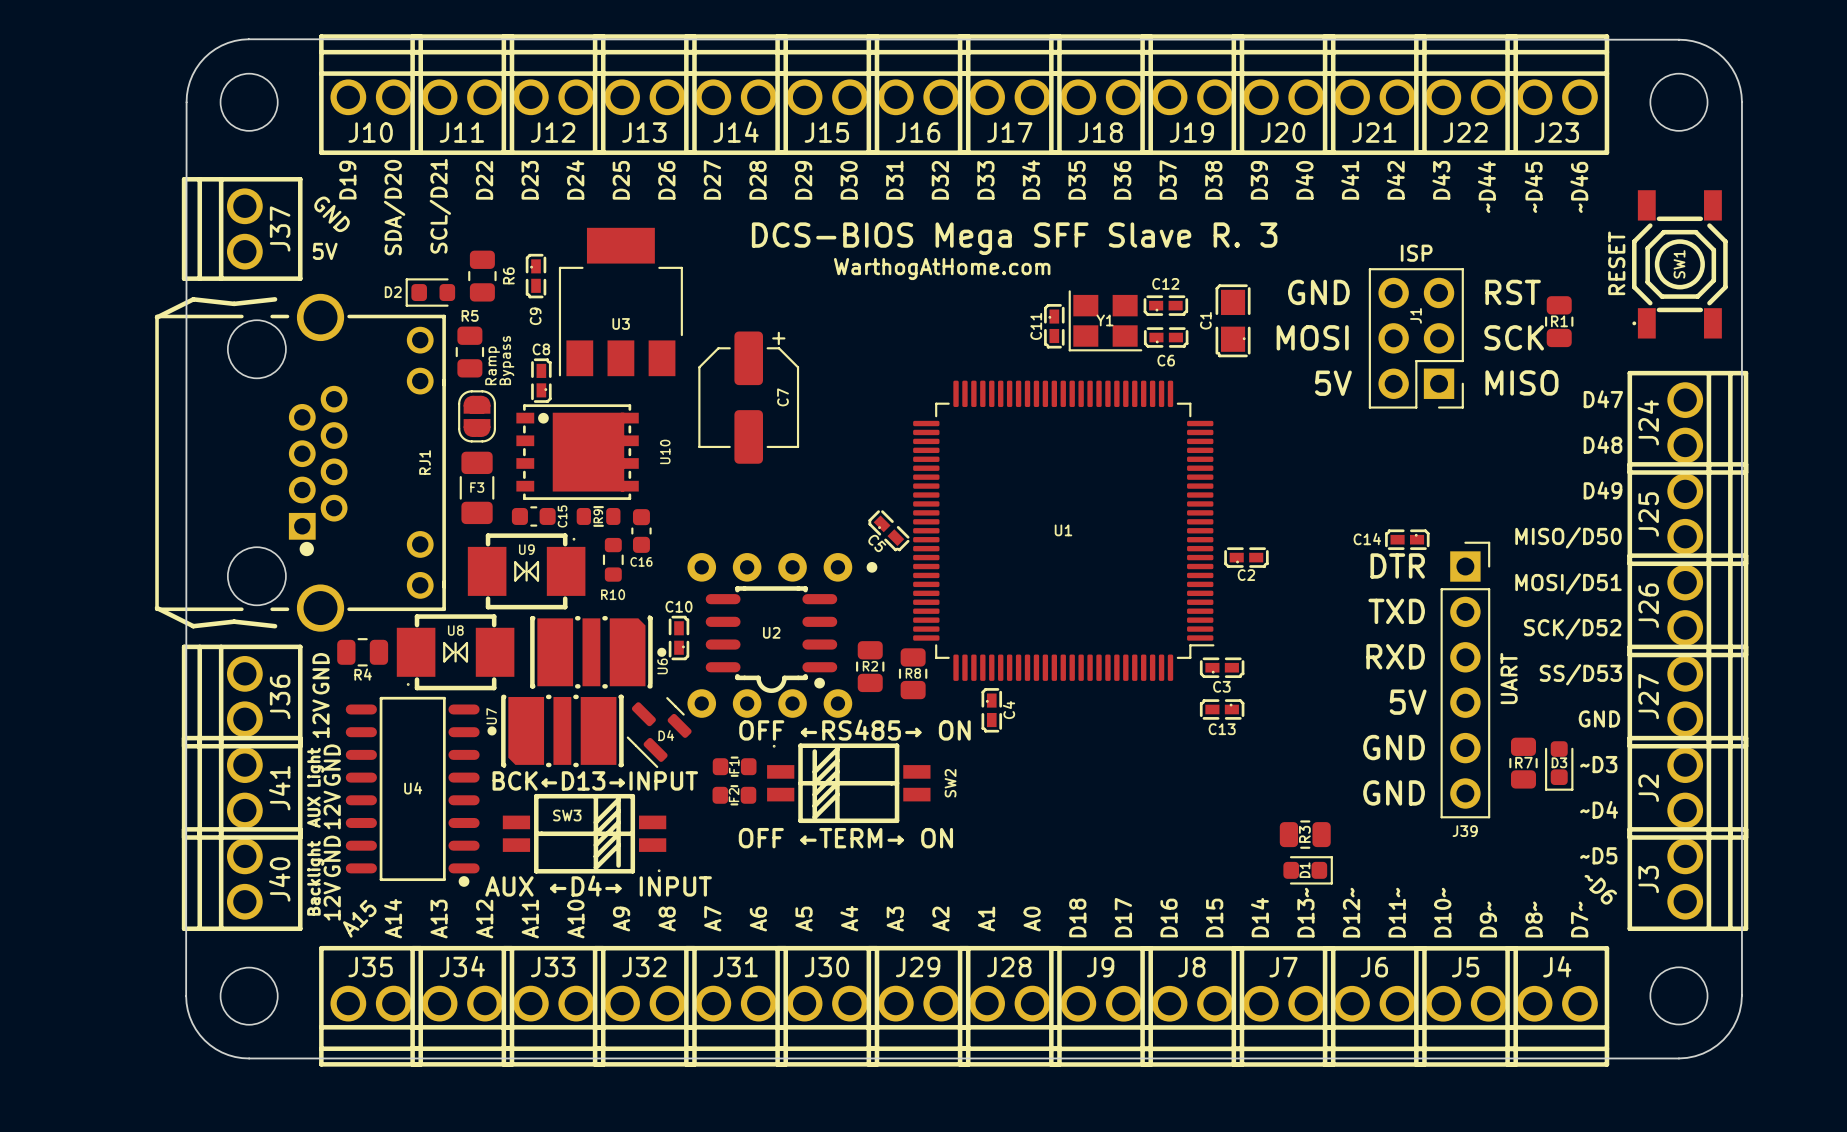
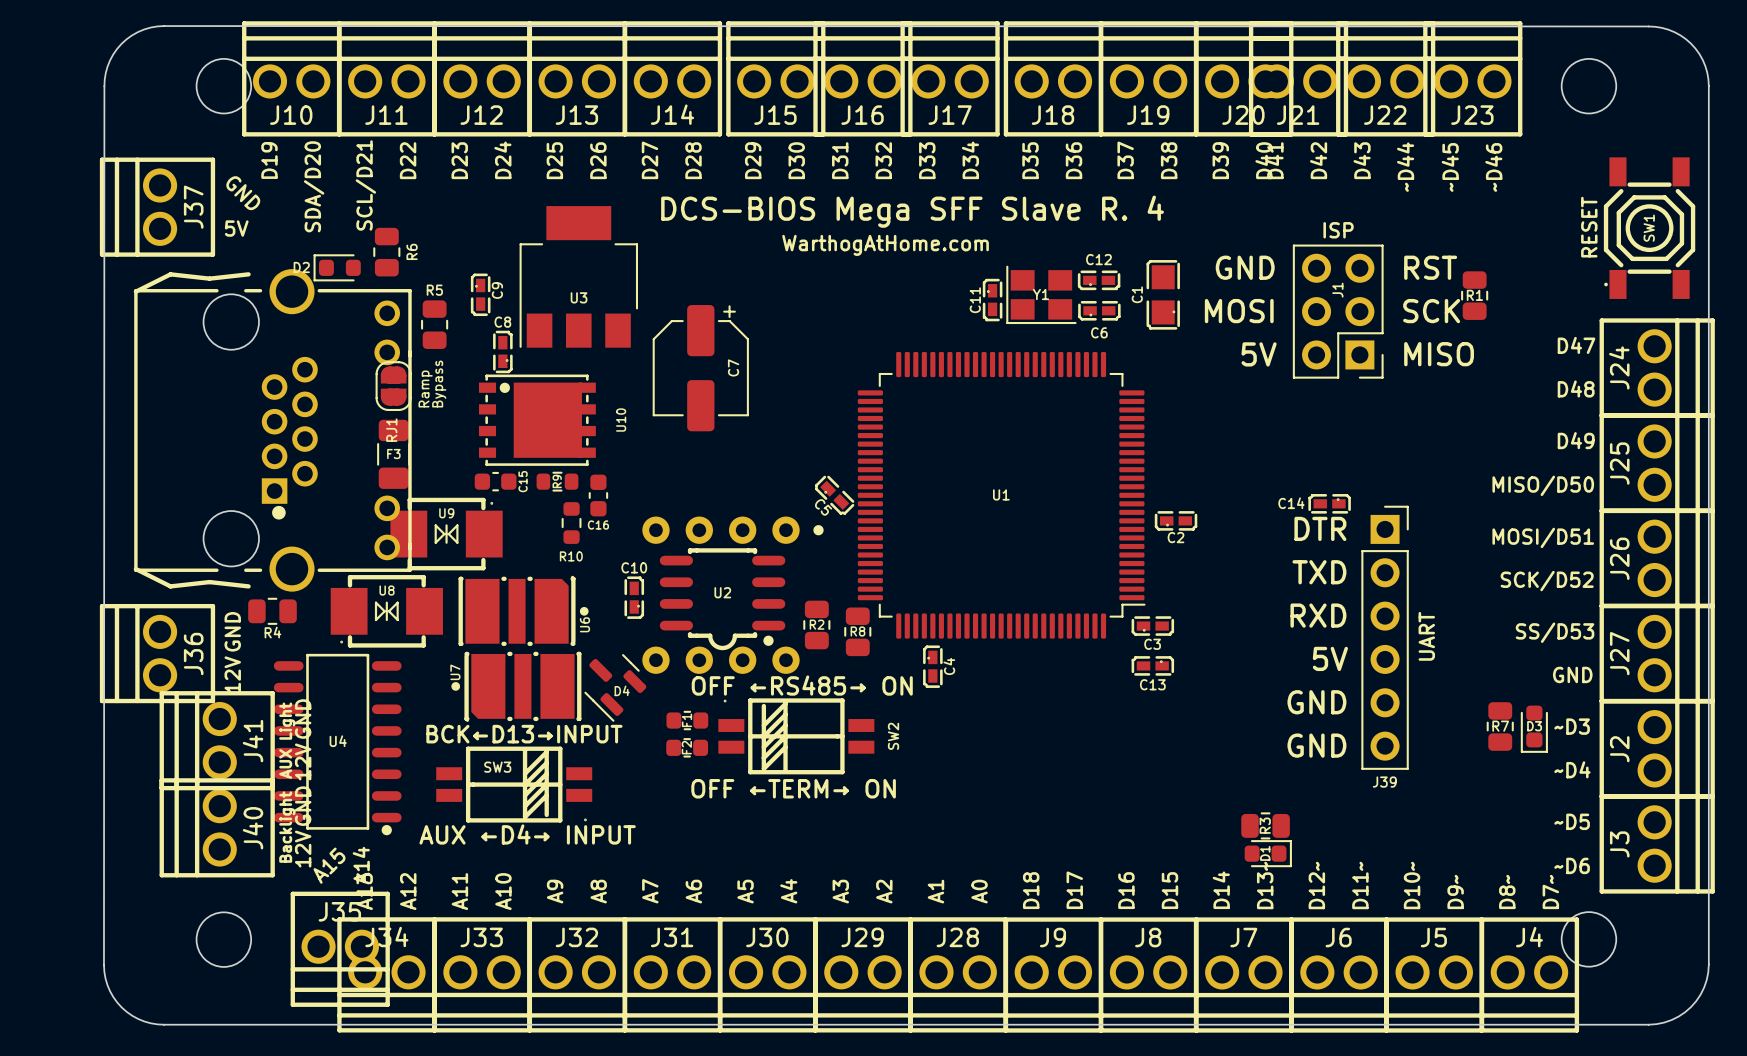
board edge: (248, 39) (234, 40) (221, 45) (204, 57) (192, 75) (186, 95) (186, 996) (189, 1016) (195, 1029) (204, 1040) (215, 1049) (228, 1055) (249, 1058) (1678, 1058) (1695, 1056) (1717, 1045) (1733, 1026) (1739, 1011) (1741, 995) (1741, 101) (1740, 87) (1735, 74) (1723, 57) (1712, 49) (1699, 43) (1678, 39) -> (223, 26) (157, 26) (137, 32) (126, 39) (113, 54) (107, 66) (104, 79) (103, 965) (107, 985) (117, 1002) (132, 1015) (144, 1021) (157, 1024) (1648, 1024) (1671, 1020) (1685, 1012) (1700, 994) (1706, 980) (1708, 964) (1708, 79) (1705, 66) (1695, 48) (1686, 39) (1674, 32) (1655, 26) (1588, 26)
J10 position: (371, 94) -> (291, 78)
J11 position: (462, 94) -> (386, 78)
J12 position: (553, 94) -> (482, 78)
J13 position: (644, 94) -> (577, 78)
J14 position: (736, 94) -> (672, 78)
J18 position: (1101, 94) -> (1053, 78)
J19 position: (1192, 94) -> (1148, 78)
J20 position: (1283, 94) -> (1243, 78)
J37 position: (242, 228) -> (157, 207)
text: DCS-BIOS Mega SFF Slave R. 3 (1014, 238) -> DCS-BIOS Mega SFF Slave R. 4 (912, 211)
SW1 position: (1679, 264) -> (1649, 228)
R6 position: (482, 276) -> (386, 252)
C9 position: (536, 276) -> (480, 294)
D2 position: (430, 292) -> (337, 267)
part: none -> (393, 386)
part: (477, 416) -> none
J24 position: (1687, 422) -> (1657, 367)
F3 position: (477, 487) -> (393, 454)
J25 position: (1687, 514) -> (1657, 463)
U9 position: (526, 571) -> (446, 534)
J26 position: (1687, 605) -> (1657, 558)
R4 position: (362, 652) -> (272, 611)
U8 position: (455, 652) -> (386, 611)
U6 position: (598, 652) -> (523, 611)
J36 position: (242, 696) -> (157, 653)
J27 position: (1687, 696) -> (1657, 653)
R7 position: (1523, 763) -> (1500, 726)
D3 position: (1559, 765) -> (1534, 729)
text position: BCK←D13→INPUT (595, 780) -> BCK←D13→INPUT (524, 734)
J2 position: (1687, 787) -> (1657, 748)
U4 position: (412, 791) -> (337, 744)
SW3 position: (584, 833) -> (514, 784)
R3 position: (1305, 834) -> (1265, 825)
D1 position: (1308, 870) -> (1268, 853)
J3 position: (1687, 879) -> (1657, 844)
text position: AUX ←D4→ INPUT (598, 886) -> AUX ←D4→ INPUT (527, 834)
J3 text rotation: 0° (1600, 889) -> 45° counterclockwise (1572, 865)
J34 position: (462, 1006) -> (386, 974)
J33 position: (553, 1006) -> (482, 974)
J32 position: (644, 1006) -> (577, 974)
J31 position: (736, 1006) -> (672, 974)
J30 position: (827, 1006) -> (767, 974)
J29 position: (918, 1006) -> (862, 974)
J28 position: (1009, 1006) -> (958, 974)
J9 position: (1101, 1006) -> (1053, 975)
J8 position: (1192, 1006) -> (1148, 975)
J7 position: (1283, 1006) -> (1243, 975)
J6 position: (1374, 1006) -> (1339, 975)
J5 position: (1466, 1006) -> (1434, 975)
J4 position: (1557, 1006) -> (1529, 975)

